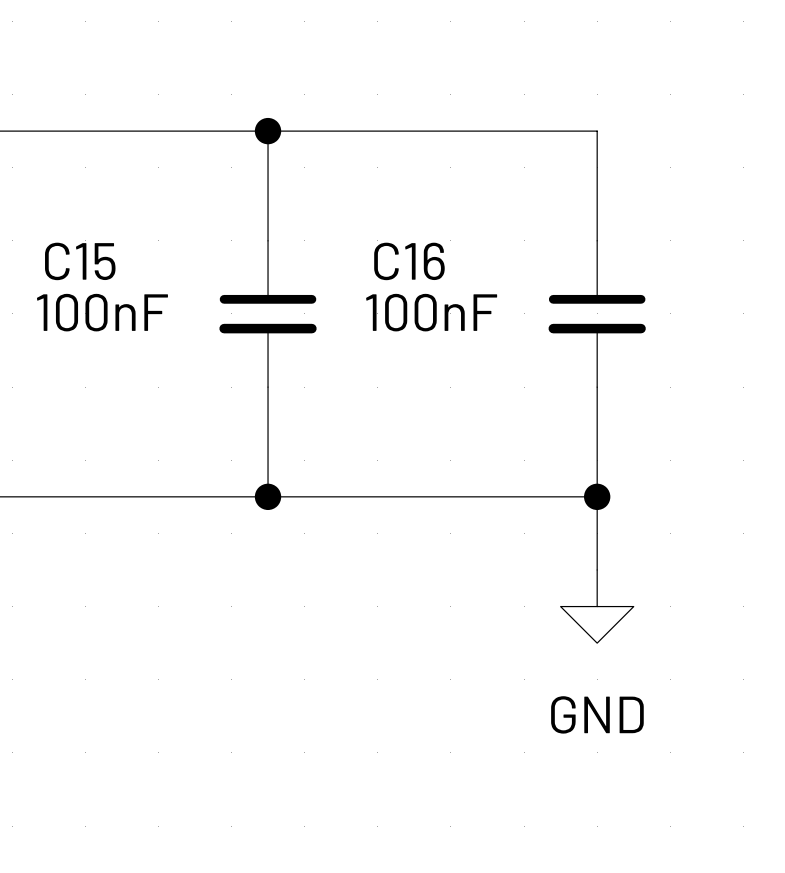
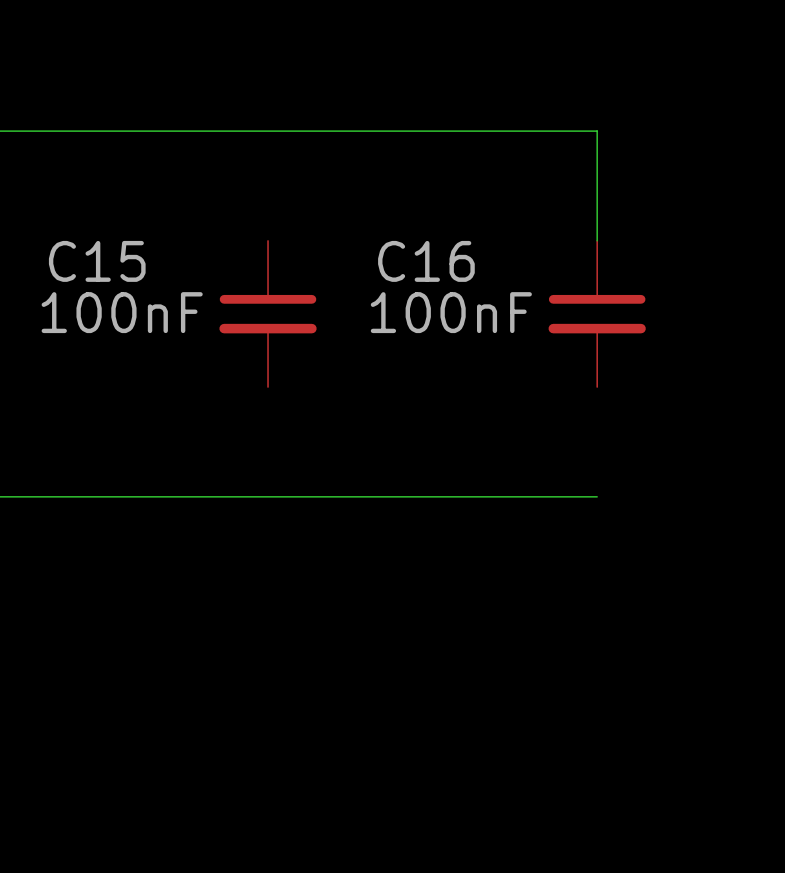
wire: (268, 131) (268, 240) -> none
junction: (268, 131) -> none
wire: (268, 387) (268, 496) -> none
wire: (597, 387) (597, 569) -> none
junction: (268, 496) -> none
junction: (597, 496) -> none
power symbol: GND (597, 606) -> none

